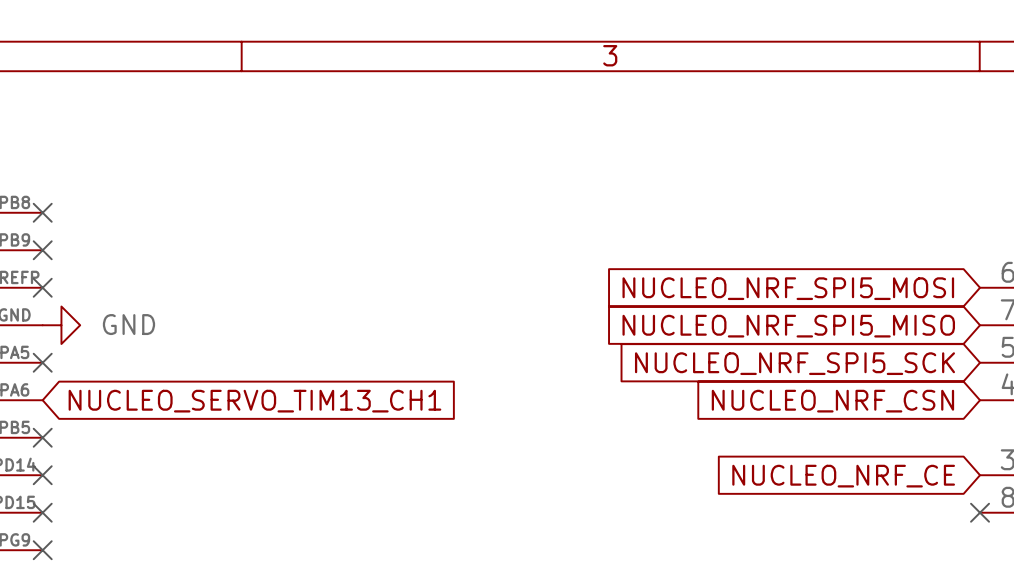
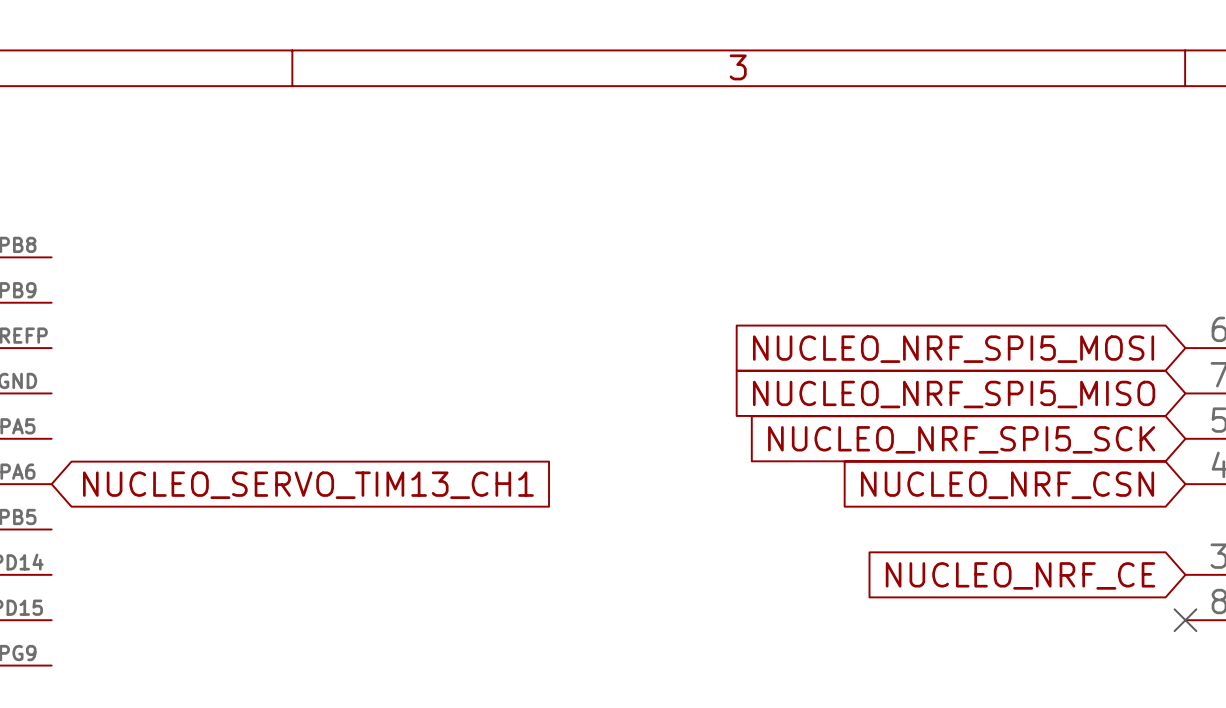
no-connect mark: (42, 212) -> none
no-connect mark: (42, 250) -> none
no-connect mark: (42, 287) -> none
power symbol: GND (61, 325) -> none
no-connect mark: (42, 362) -> none
no-connect mark: (42, 437) -> none
no-connect mark: (42, 475) -> none
no-connect mark: (42, 512) -> none
no-connect mark: (42, 550) -> none

